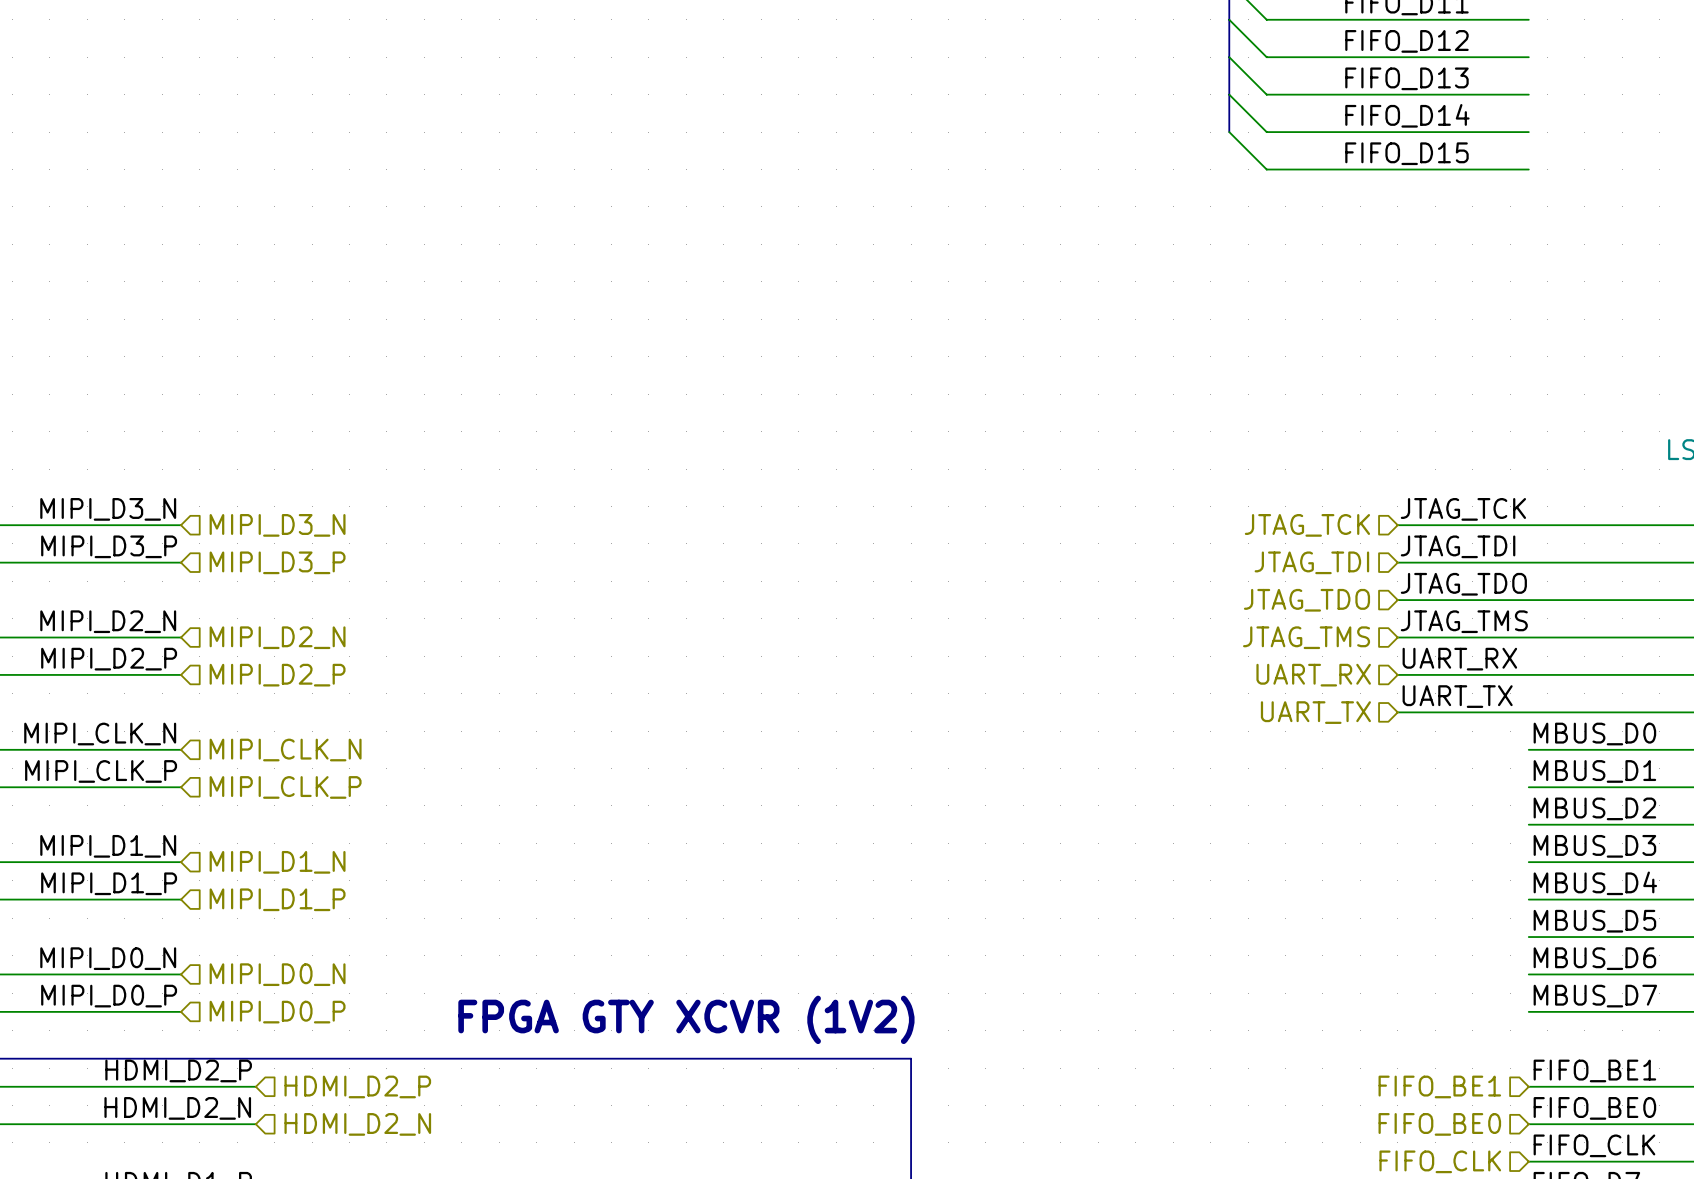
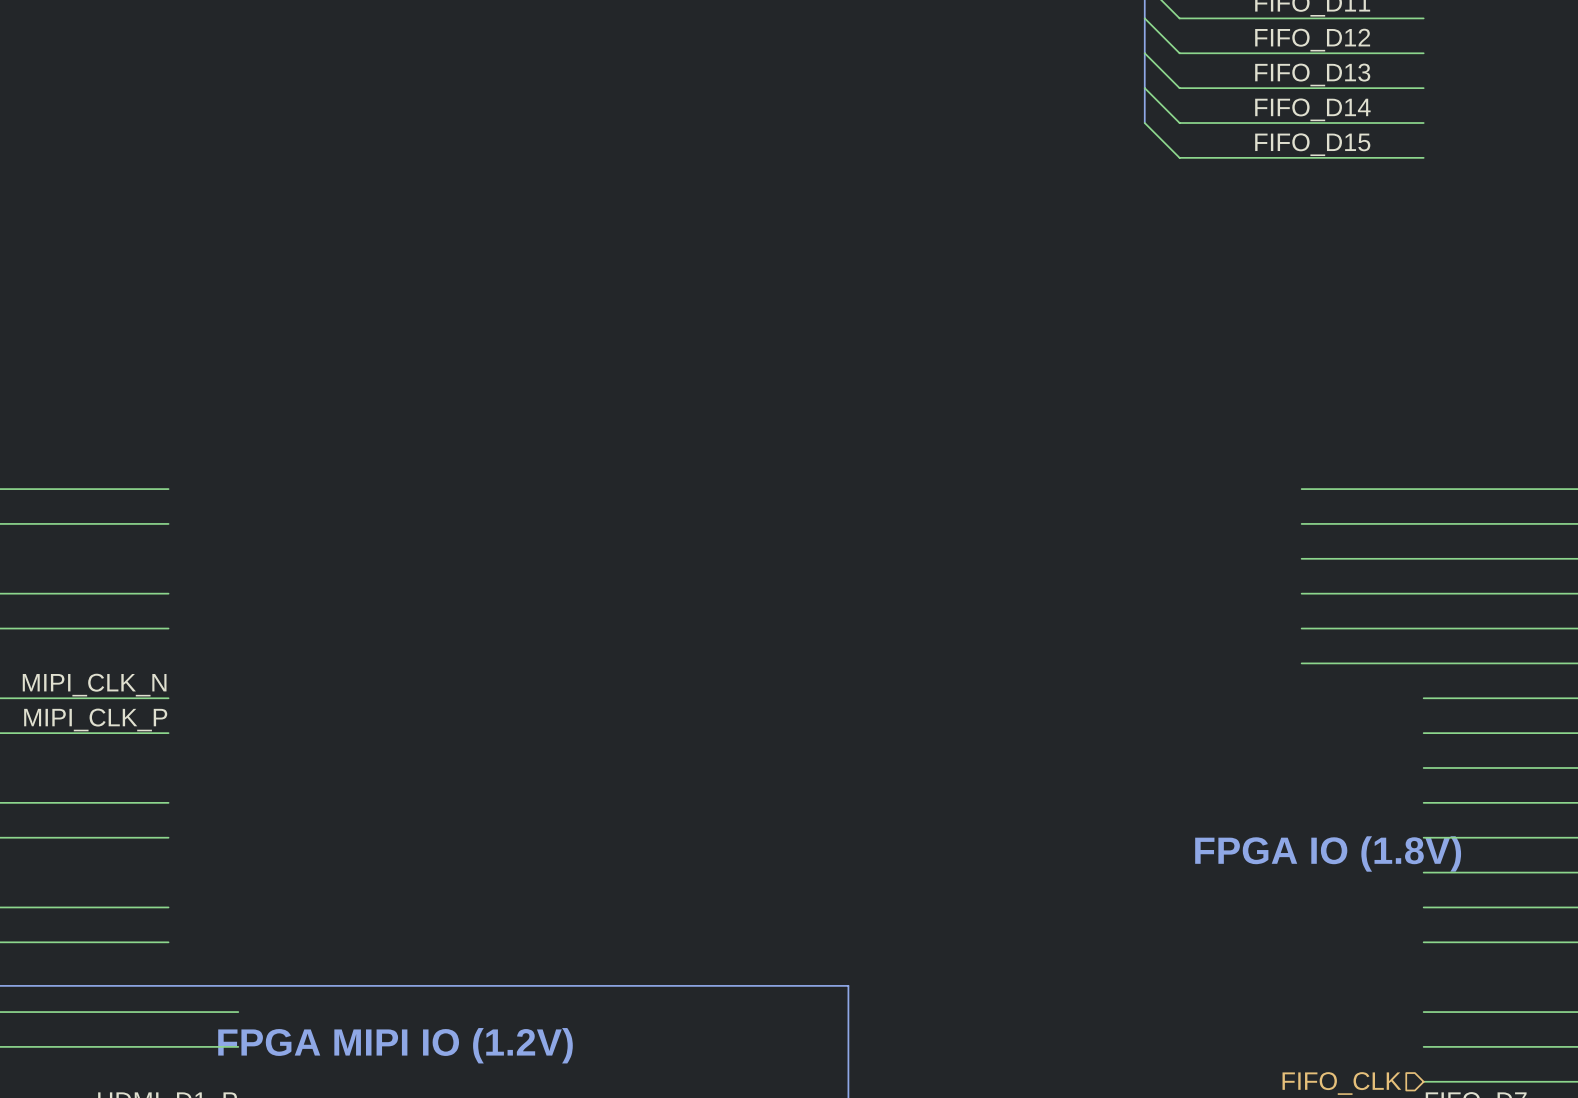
label: MIPI_D3_N (108, 509) -> none
label: JTAG_TCK (1463, 509) -> none
hierarchical label: MIPI_D3_N (277, 525) -> none
hierarchical label: JTAG_TCK (1307, 525) -> none
label: MIPI_D3_P (109, 546) -> none
label: JTAG_TDI (1458, 546) -> none
hierarchical label: MIPI_D3_P (277, 562) -> none
hierarchical label: JTAG_TDI (1311, 562) -> none
label: JTAG_TDO (1463, 584) -> none
hierarchical label: JTAG_TDO (1306, 600) -> none
label: MIPI_D2_N (108, 621) -> none
label: JTAG_TMS (1464, 621) -> none
hierarchical label: MIPI_D2_N (277, 637) -> none
hierarchical label: JTAG_TMS (1306, 637) -> none
label: MIPI_D2_P (109, 659) -> none
label: UART_RX (1459, 659) -> none
hierarchical label: MIPI_D2_P (277, 675) -> none
hierarchical label: UART_RX (1313, 675) -> none
label: UART_TX (1457, 696) -> none
hierarchical label: UART_TX (1315, 712) -> none
label: MBUS_D0 (1594, 734) -> none
hierarchical label: MIPI_CLK_N (285, 750) -> none
label: MBUS_D1 (1594, 771) -> none
hierarchical label: MIPI_CLK_P (285, 787) -> none
label: MBUS_D2 (1594, 808) -> none
label: MIPI_D1_N (108, 846) -> none
label: MBUS_D3 (1594, 846) -> none
hierarchical label: MIPI_D1_N (277, 862) -> none
label: MIPI_D1_P (109, 883) -> none
label: MBUS_D4 (1595, 883) -> none
hierarchical label: MIPI_D1_P (277, 899) -> none
text: none -> FPGA IO (1.8V) (1328, 853)
label: MBUS_D5 (1594, 921) -> none
label: MIPI_D0_N (108, 958) -> none
label: MBUS_D6 (1594, 958) -> none
hierarchical label: MIPI_D0_N (277, 974) -> none
label: MIPI_D0_P (109, 996) -> none
label: MBUS_D7 (1595, 996) -> none
hierarchical label: MIPI_D0_P (277, 1012) -> none
text: FPGA GTY XCVR (1V2) (686, 1019) -> none
label: HDMI_D2_P (178, 1070) -> none
label: FIFO_BE1 (1594, 1070) -> none
hierarchical label: HDMI_D2_P (357, 1086) -> none
hierarchical label: FIFO_BE1 (1439, 1086) -> none
label: HDMI_D2_N (177, 1108) -> none
label: FIFO_BE0 (1594, 1108) -> none
text: none -> FPGA MIPI IO (1.2V) (395, 1045)
hierarchical label: HDMI_D2_N (357, 1124) -> none
hierarchical label: FIFO_BE0 (1439, 1124) -> none
label: FIFO_CLK (1594, 1145) -> none

